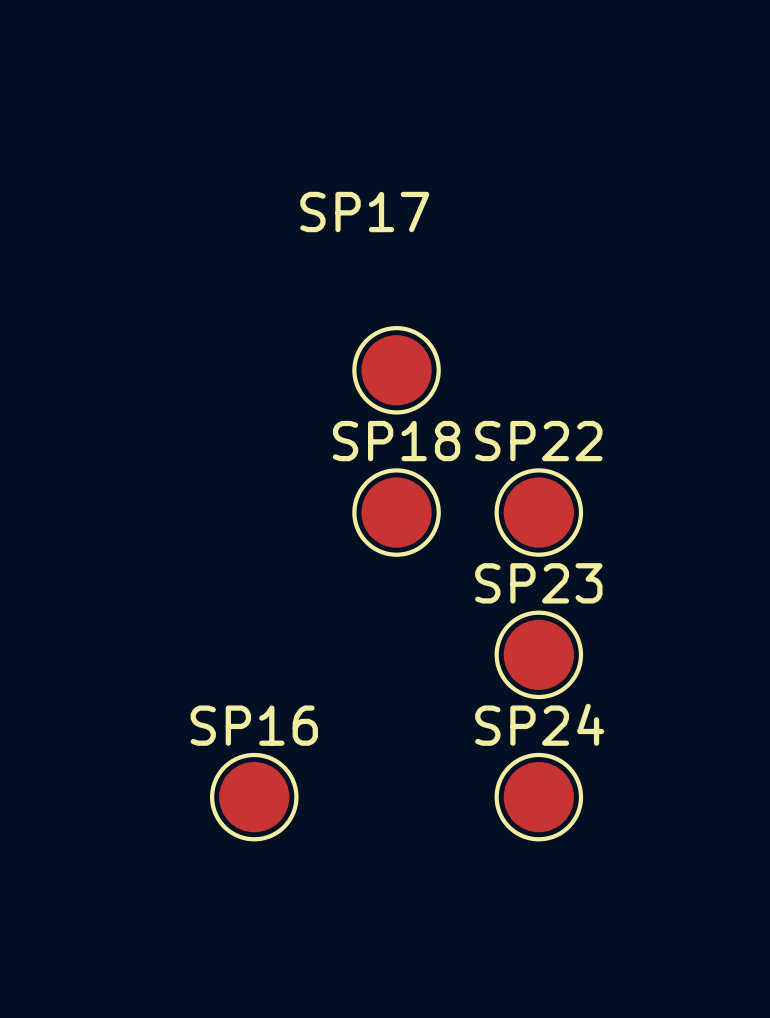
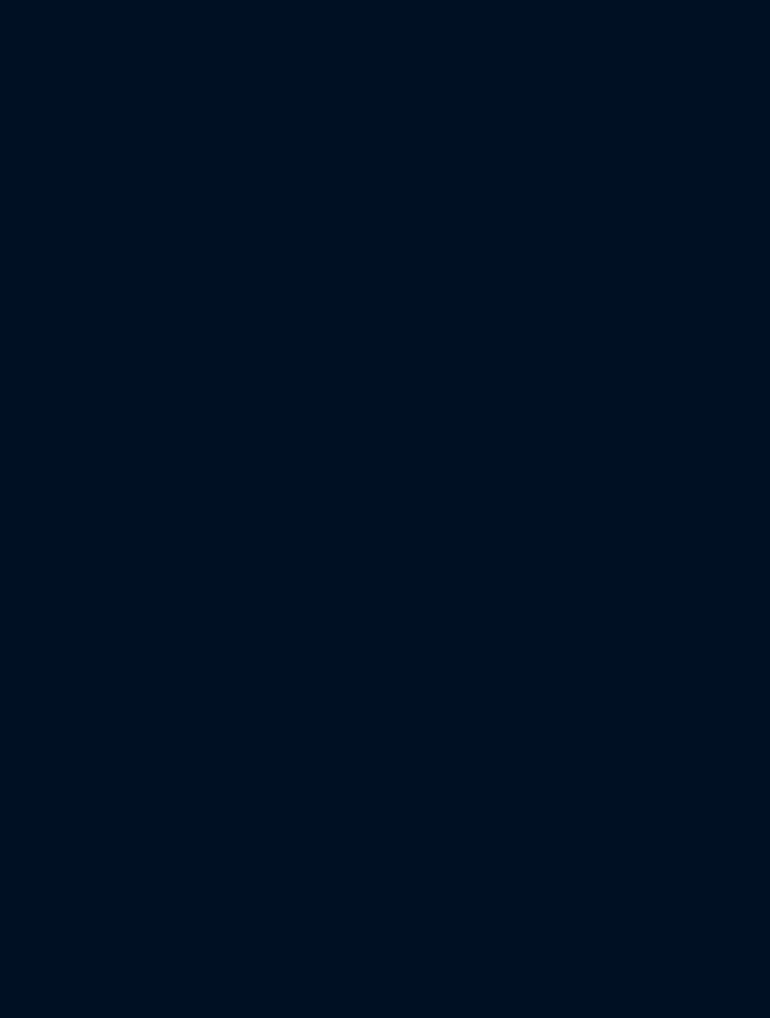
SP17: (396, 370) -> none
SP18: (396, 512) -> none
SP22: (538, 512) -> none
SP23: (538, 654) -> none
SP16: (254, 797) -> none
SP24: (538, 797) -> none

